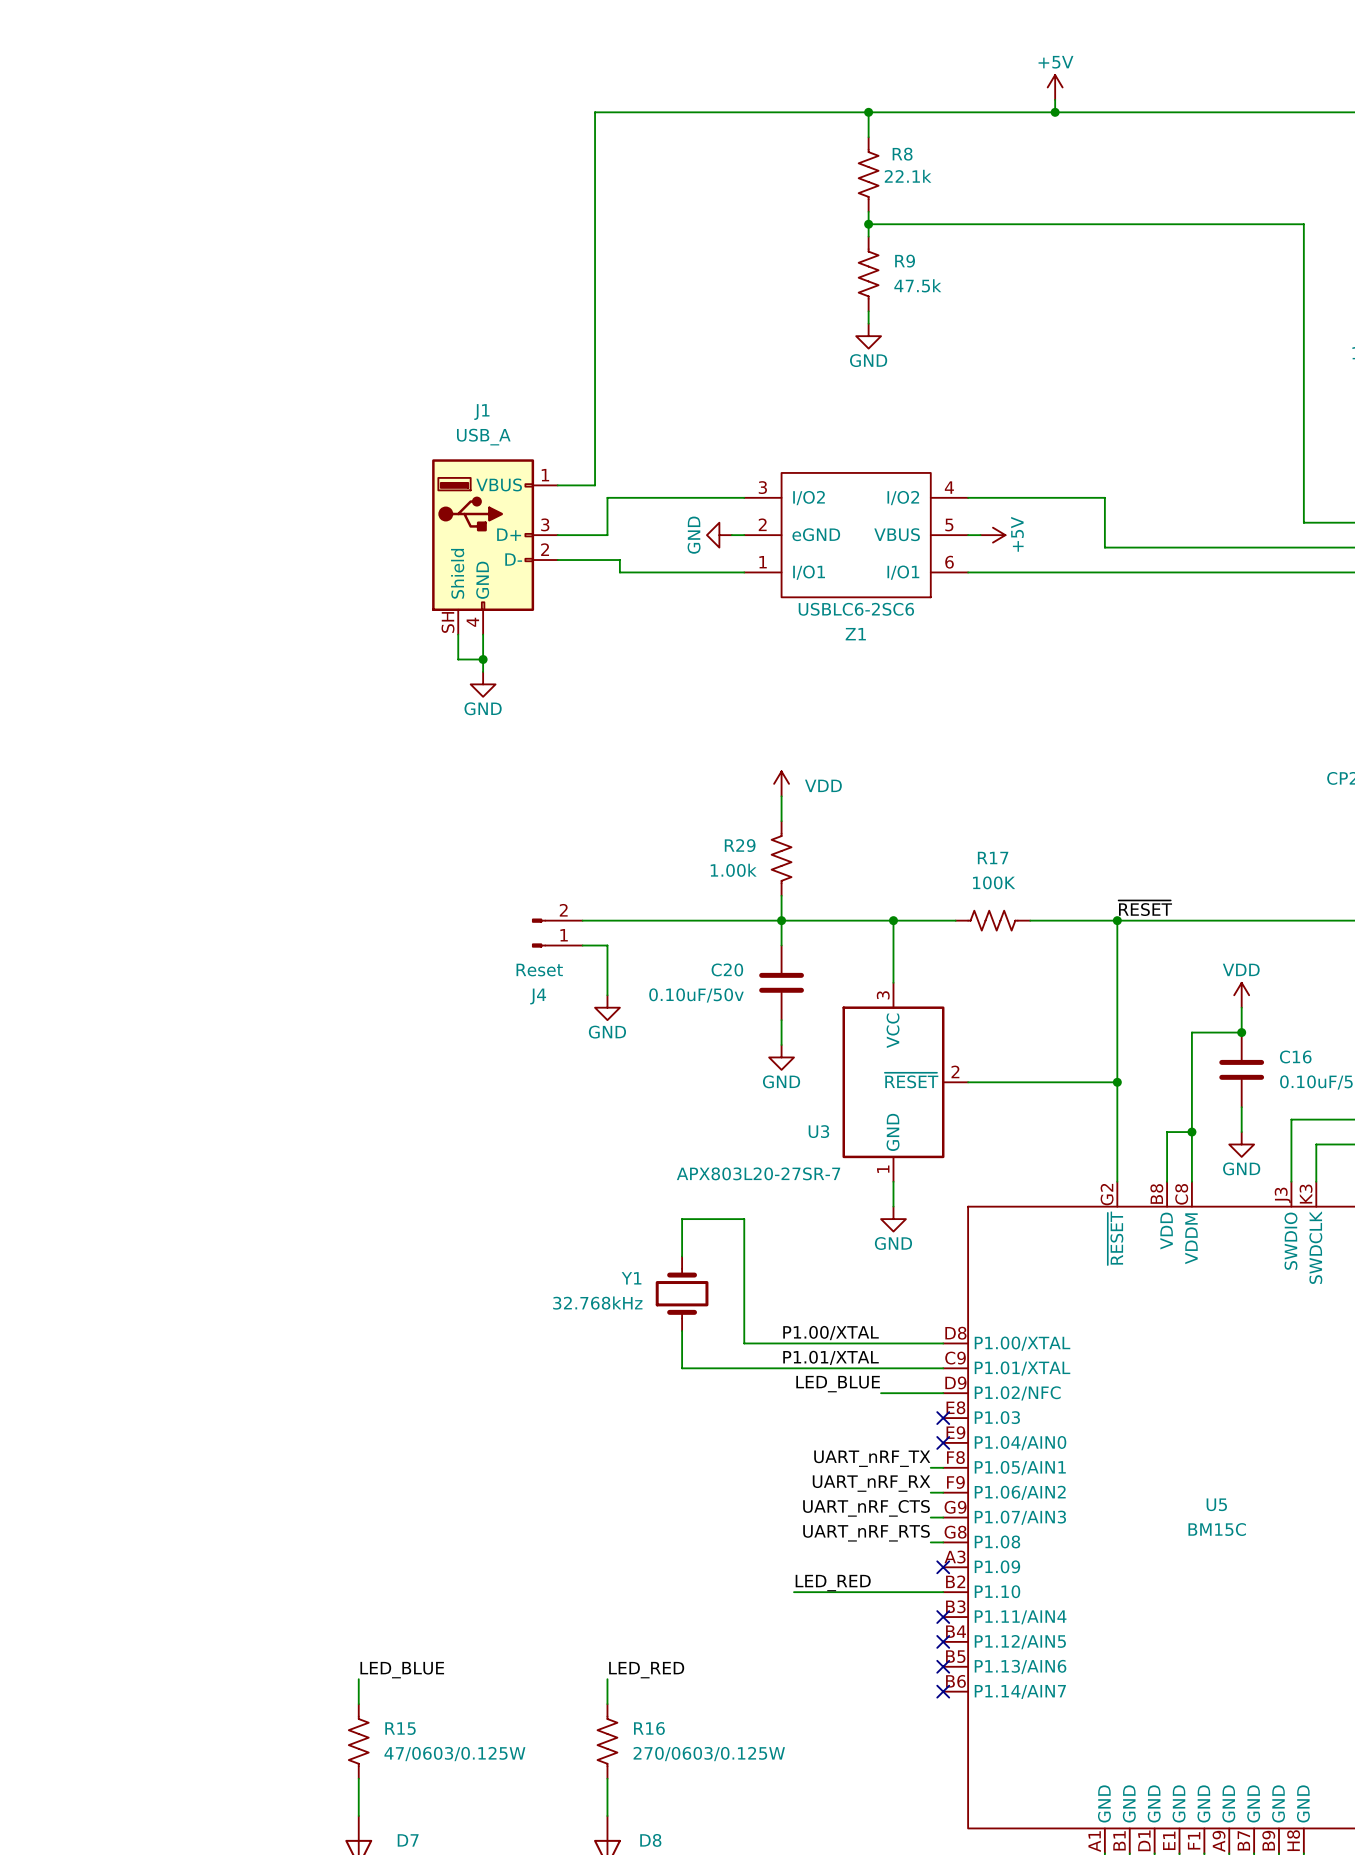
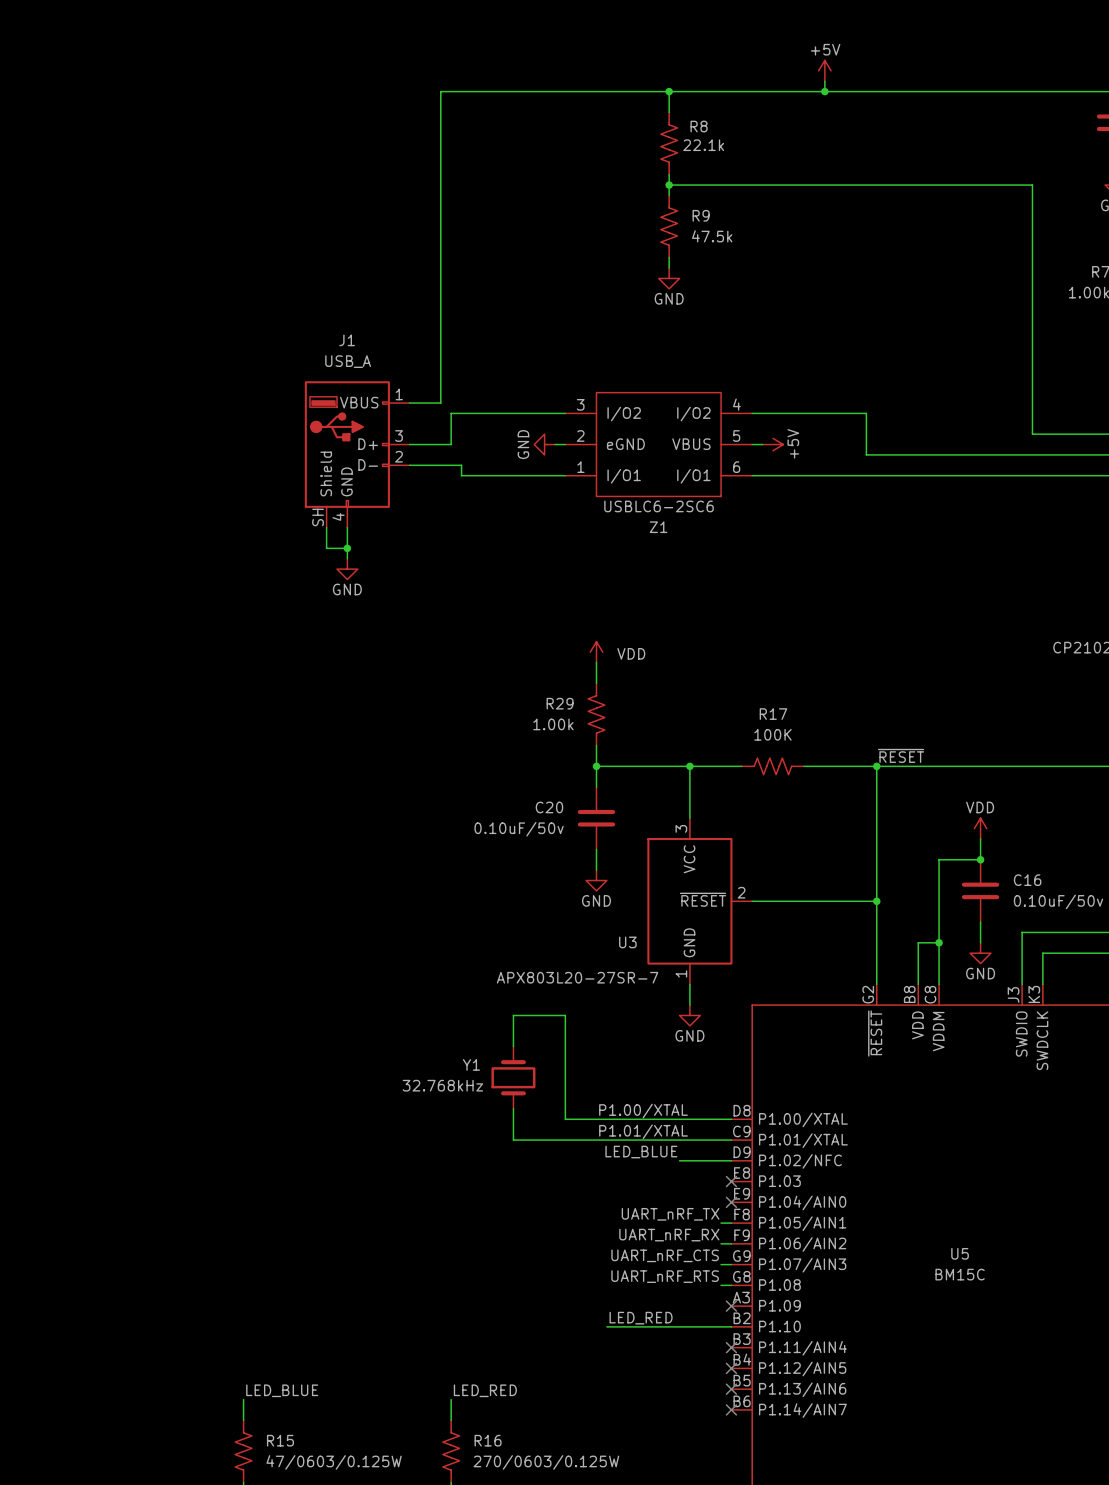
wire: (582, 920) (781, 920) -> none
J4: Reset (557, 933) -> none
wire: (582, 945) (607, 945) (607, 995) -> none
power symbol: GND (607, 1007) -> none

